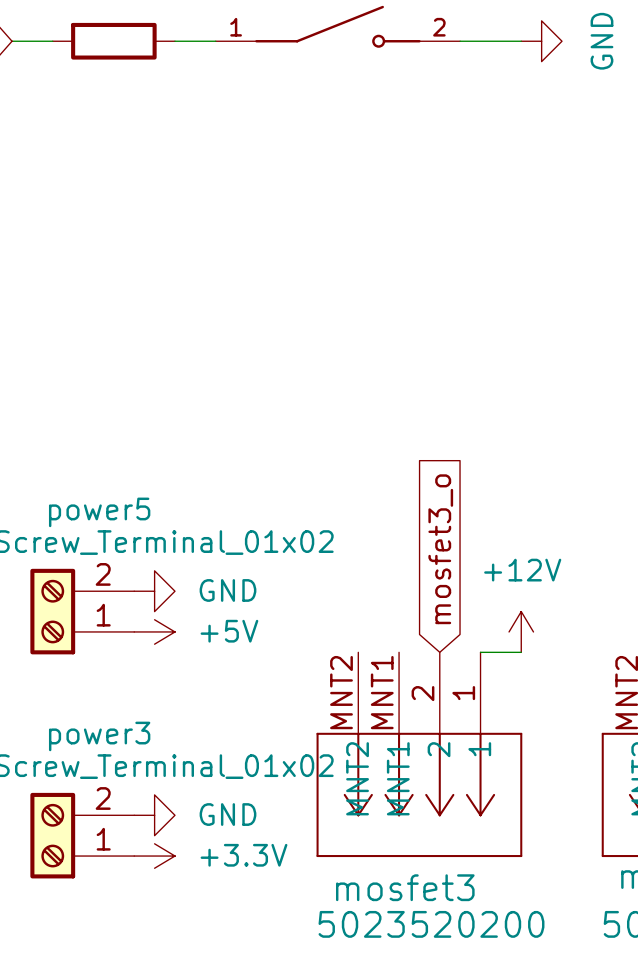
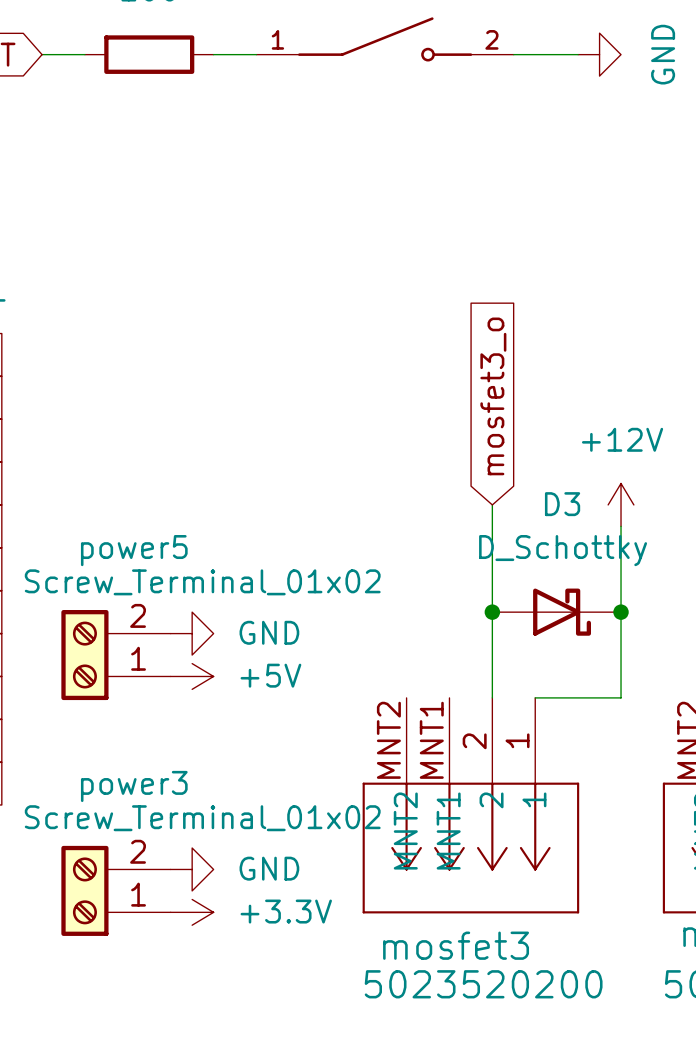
wire: none -> (492, 504) (492, 697)
wire: none -> (621, 526) (621, 697) (578, 697)
global label position: mosfet3_o (440, 549) -> mosfet3_o (493, 396)
junction: none -> (492, 612)
D3: none -> D_Schottky (556, 612)
junction: none -> (621, 612)
power symbol position: +12V (521, 631) -> +12V (621, 504)

